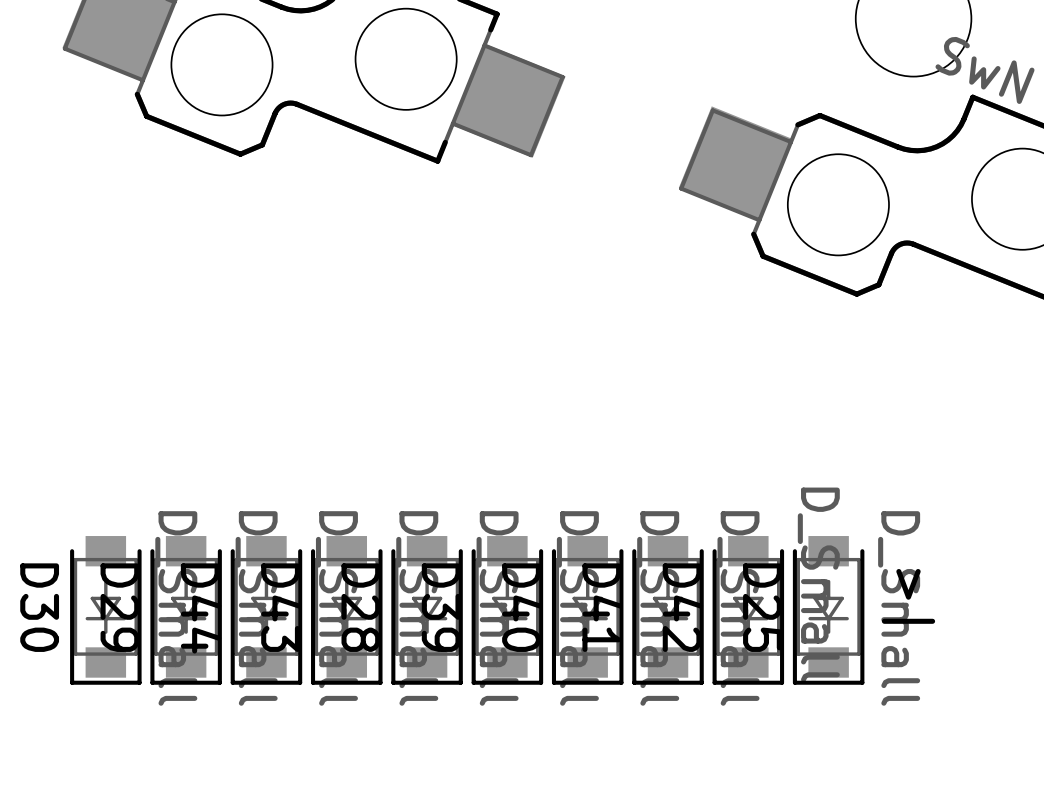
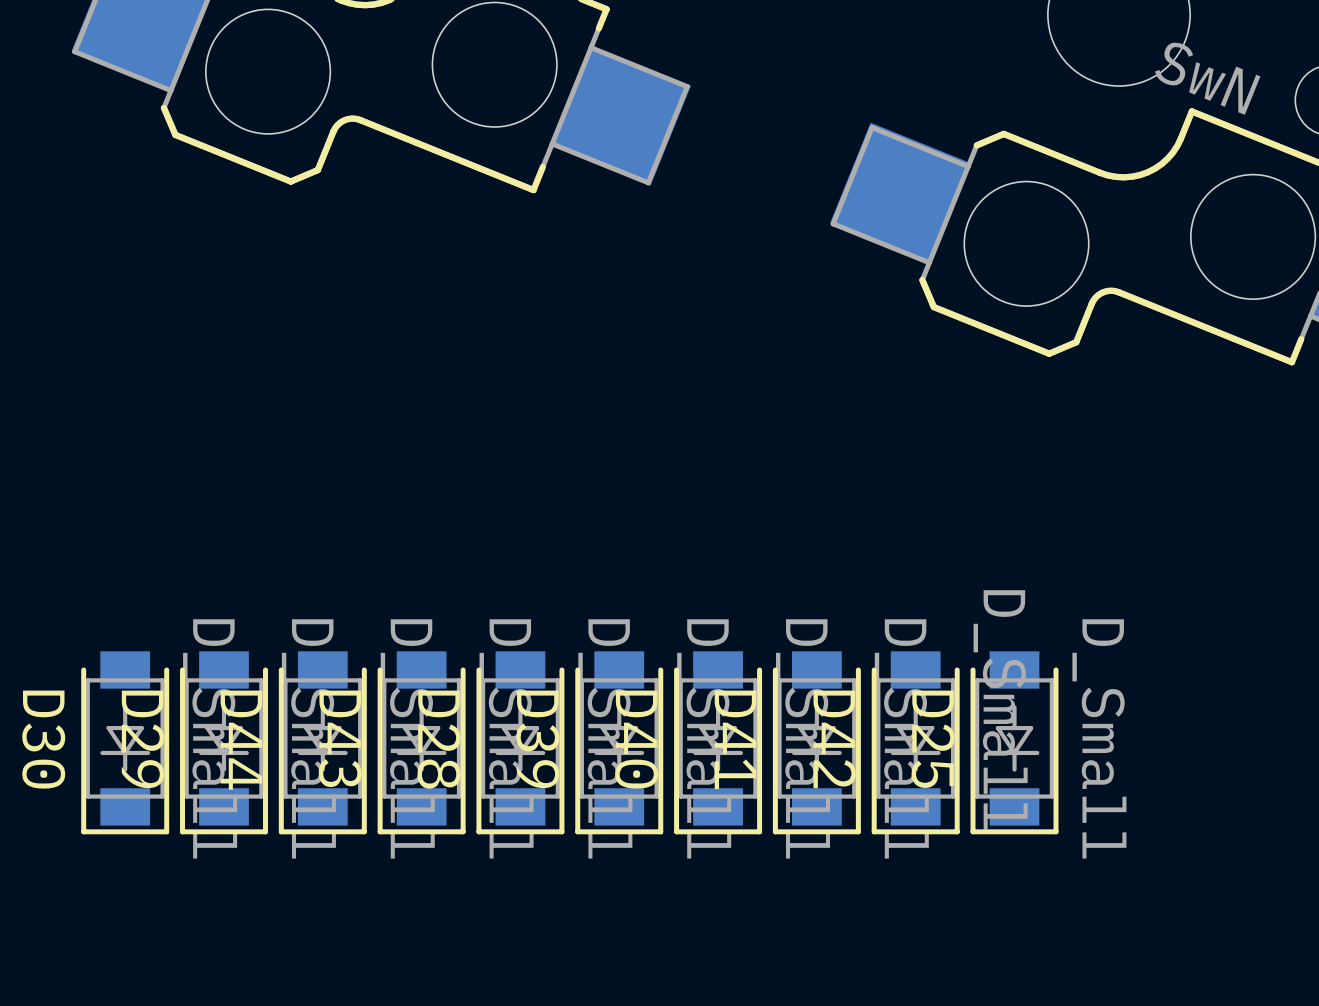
text: |< (908, 596) -> none

